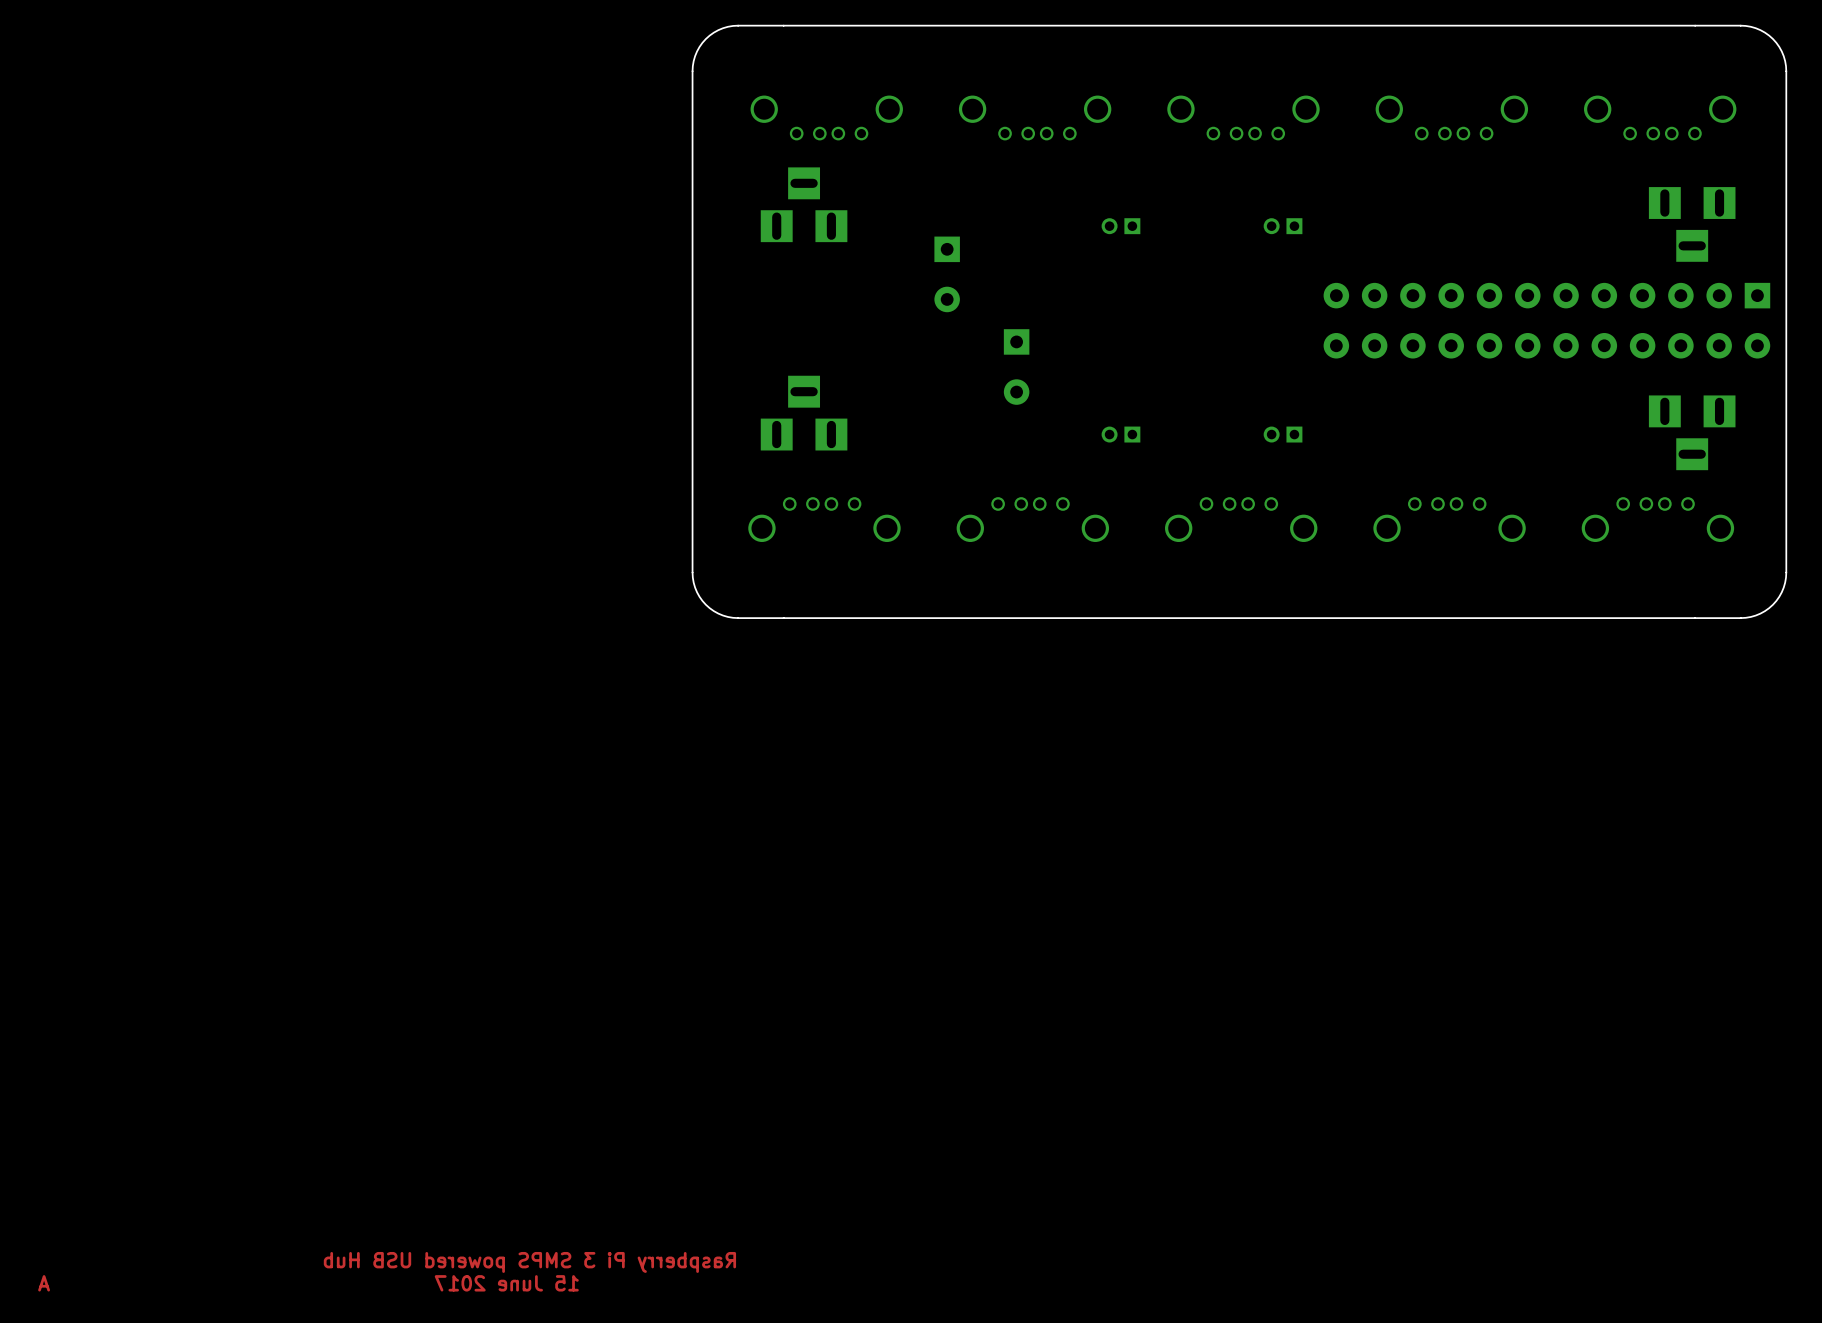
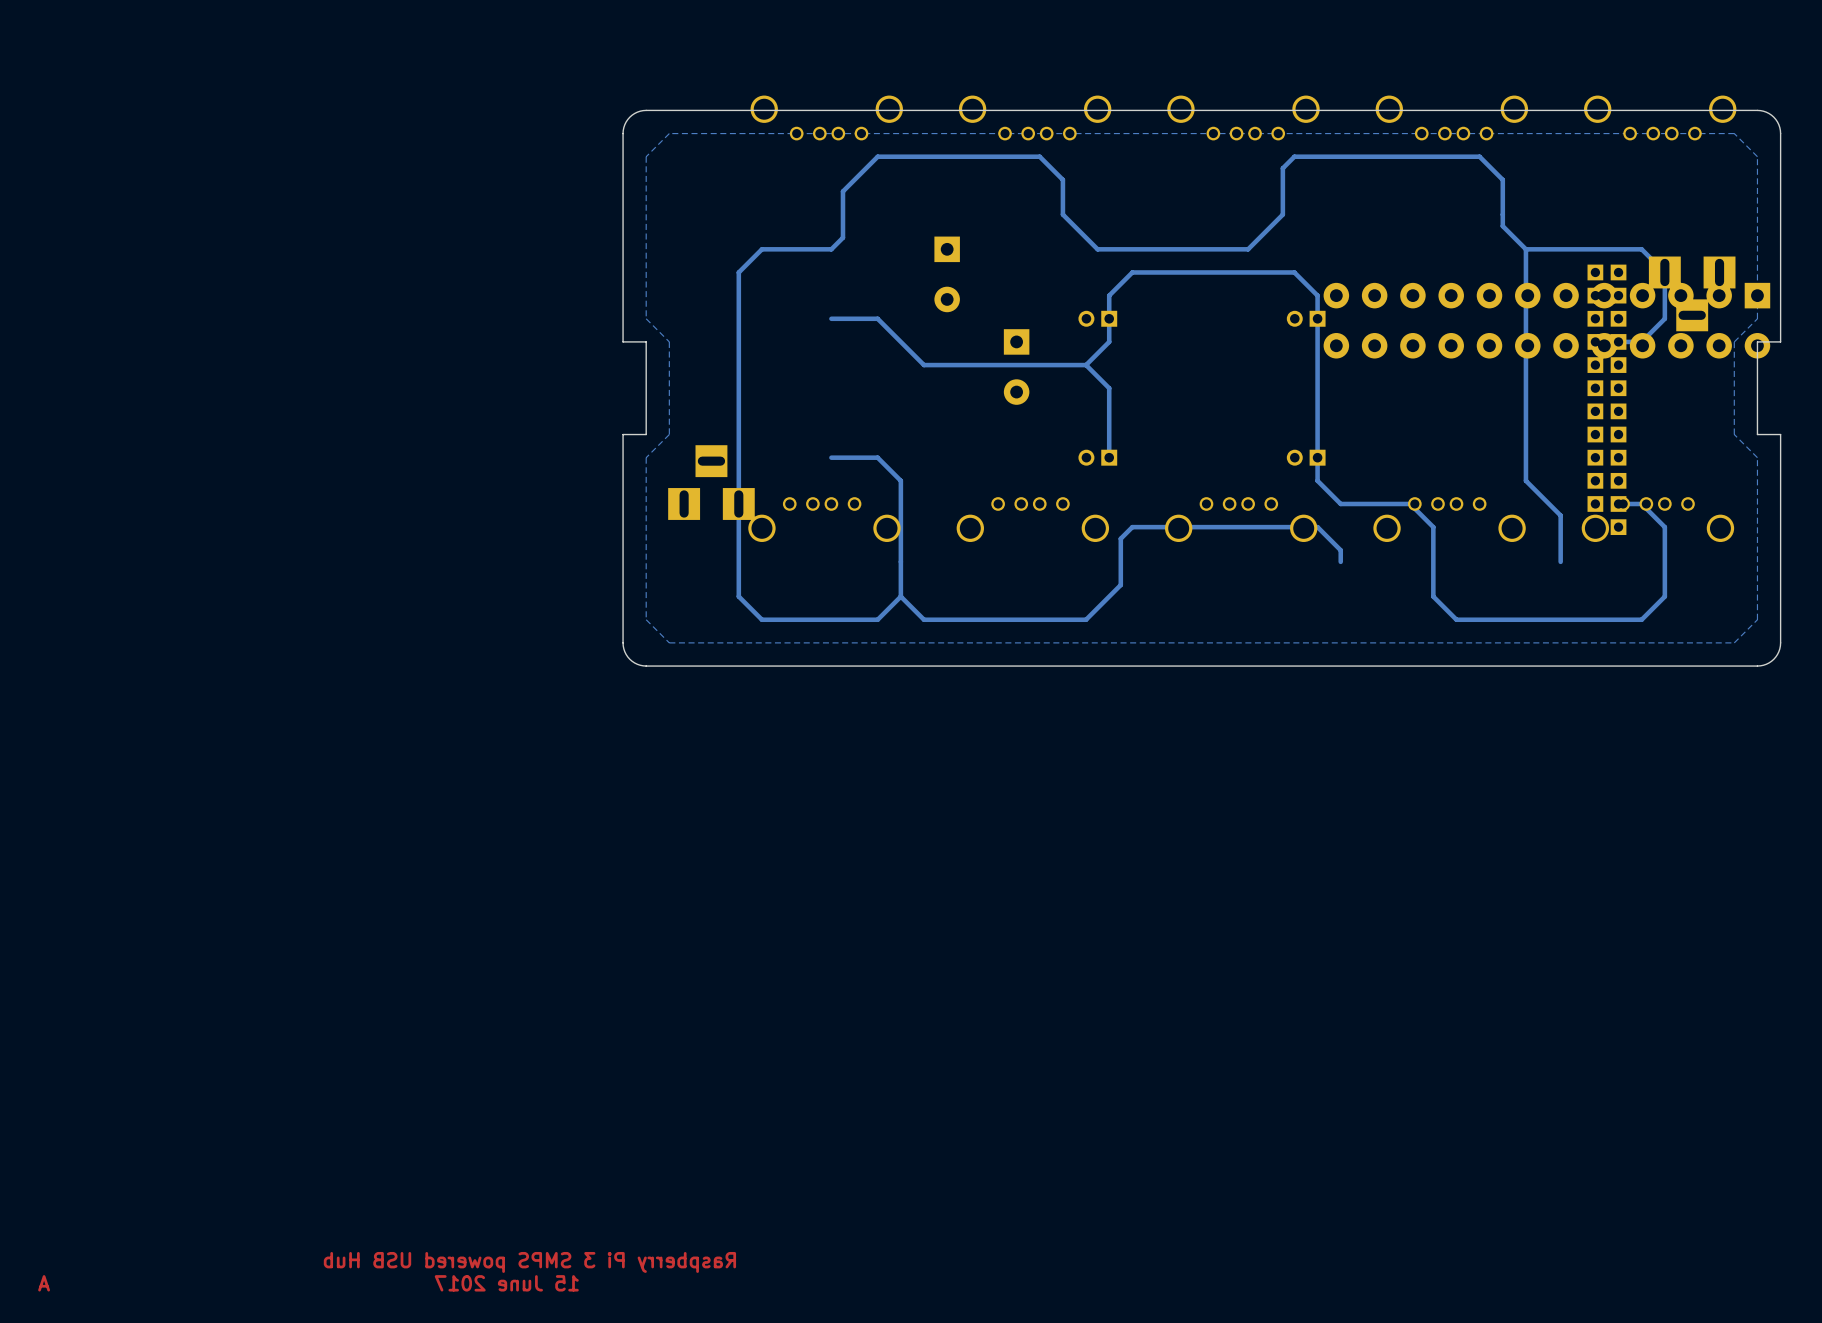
board edge: (1740, 25) (738, 25) (718, 30) (705, 39) (699, 46) (695, 56) (692, 71) (692, 572) (697, 592) (705, 604) (713, 611) (727, 616) (738, 618) (1740, 618) (1760, 613) (1772, 604) (1779, 596) (1785, 582) (1786, 572) (1786, 71) (1783, 56) (1772, 39) (1760, 30) (1740, 25) -> (1757, 110) (646, 110) (637, 112) (627, 119) (623, 133) (623, 341) (646, 341) (646, 434) (623, 434) (623, 642) (624, 651) (634, 662) (646, 666) (1757, 666) (1766, 664) (1775, 656) (1780, 642) (1780, 434) (1757, 434) (1757, 341) (1780, 341) (1780, 133) (1778, 124) (1773, 117) (1766, 112) (1757, 110)
bottom zone outline: none -> (1734, 133) (669, 133) (646, 156) (646, 318) (669, 341) (669, 434) (646, 457) (646, 619) (669, 642) (1734, 642) (1757, 619) (1757, 457) (1734, 434) (1734, 341) (1757, 318) (1757, 156) (1734, 133)
part: (804, 204) -> none
part: (1692, 224) -> none
part: (1120, 226) -> none
part: (1283, 226) -> none
bottom track: none -> (1525, 249) (1525, 480) (1560, 515) (1560, 561)
bottom track: none -> (1525, 249) (1641, 249) (1664, 272) (1664, 318) (1641, 341) (1618, 341)
bottom track: none -> (1525, 249) (1502, 226) (1502, 179) (1479, 156) (1294, 156) (1282, 168) (1282, 214) (1248, 249) (1097, 249) (1062, 214) (1062, 179) (1039, 156) (877, 156) (842, 191) (842, 237) (831, 249) (761, 249) (738, 272) (738, 596) (761, 619) (877, 619) (900, 596)
part: none -> (1692, 293)
bottom track: none -> (831, 318) (877, 318) (924, 365) (1086, 365)
part: none -> (1097, 318)
part: none -> (1306, 318)
bottom track: none -> (1086, 365) (1109, 388) (1109, 457)
bottom track: none -> (1086, 365) (1109, 341) (1109, 295) (1132, 272) (1294, 272) (1317, 295) (1317, 480) (1340, 503) (1410, 503) (1433, 527) (1433, 596) (1456, 619) (1641, 619) (1664, 596) (1664, 527) (1641, 503) (1618, 503)
part: none -> (1606, 399)
part position: (804, 413) -> (711, 482)
part: (1692, 432) -> none
part position: (1120, 434) -> (1097, 457)
part position: (1283, 434) -> (1306, 457)
bottom track: none -> (831, 457) (877, 457) (900, 480) (900, 596)
bottom track: none -> (1340, 561) (1340, 550) (1317, 527) (1132, 527) (1120, 538) (1120, 585) (1086, 619) (924, 619) (900, 596)

